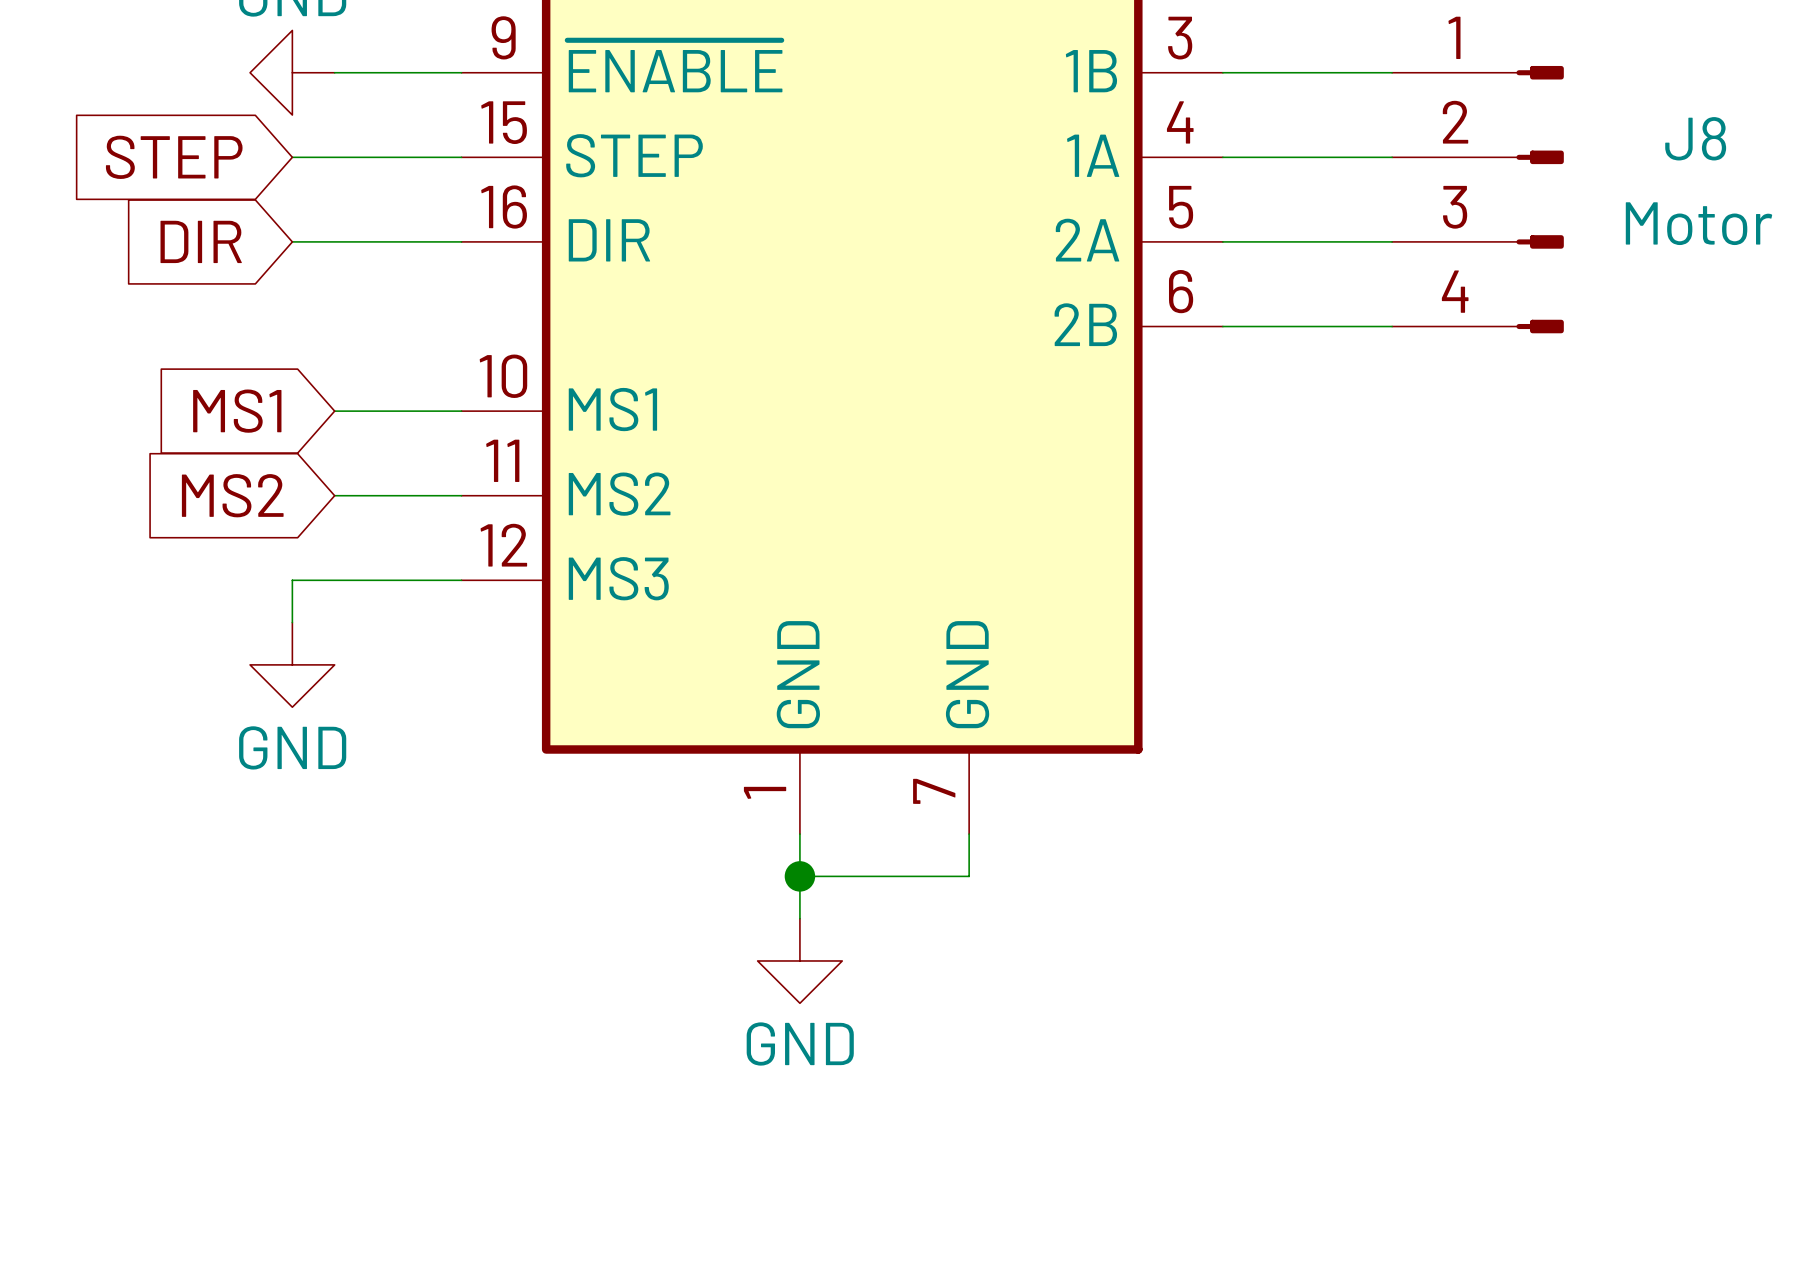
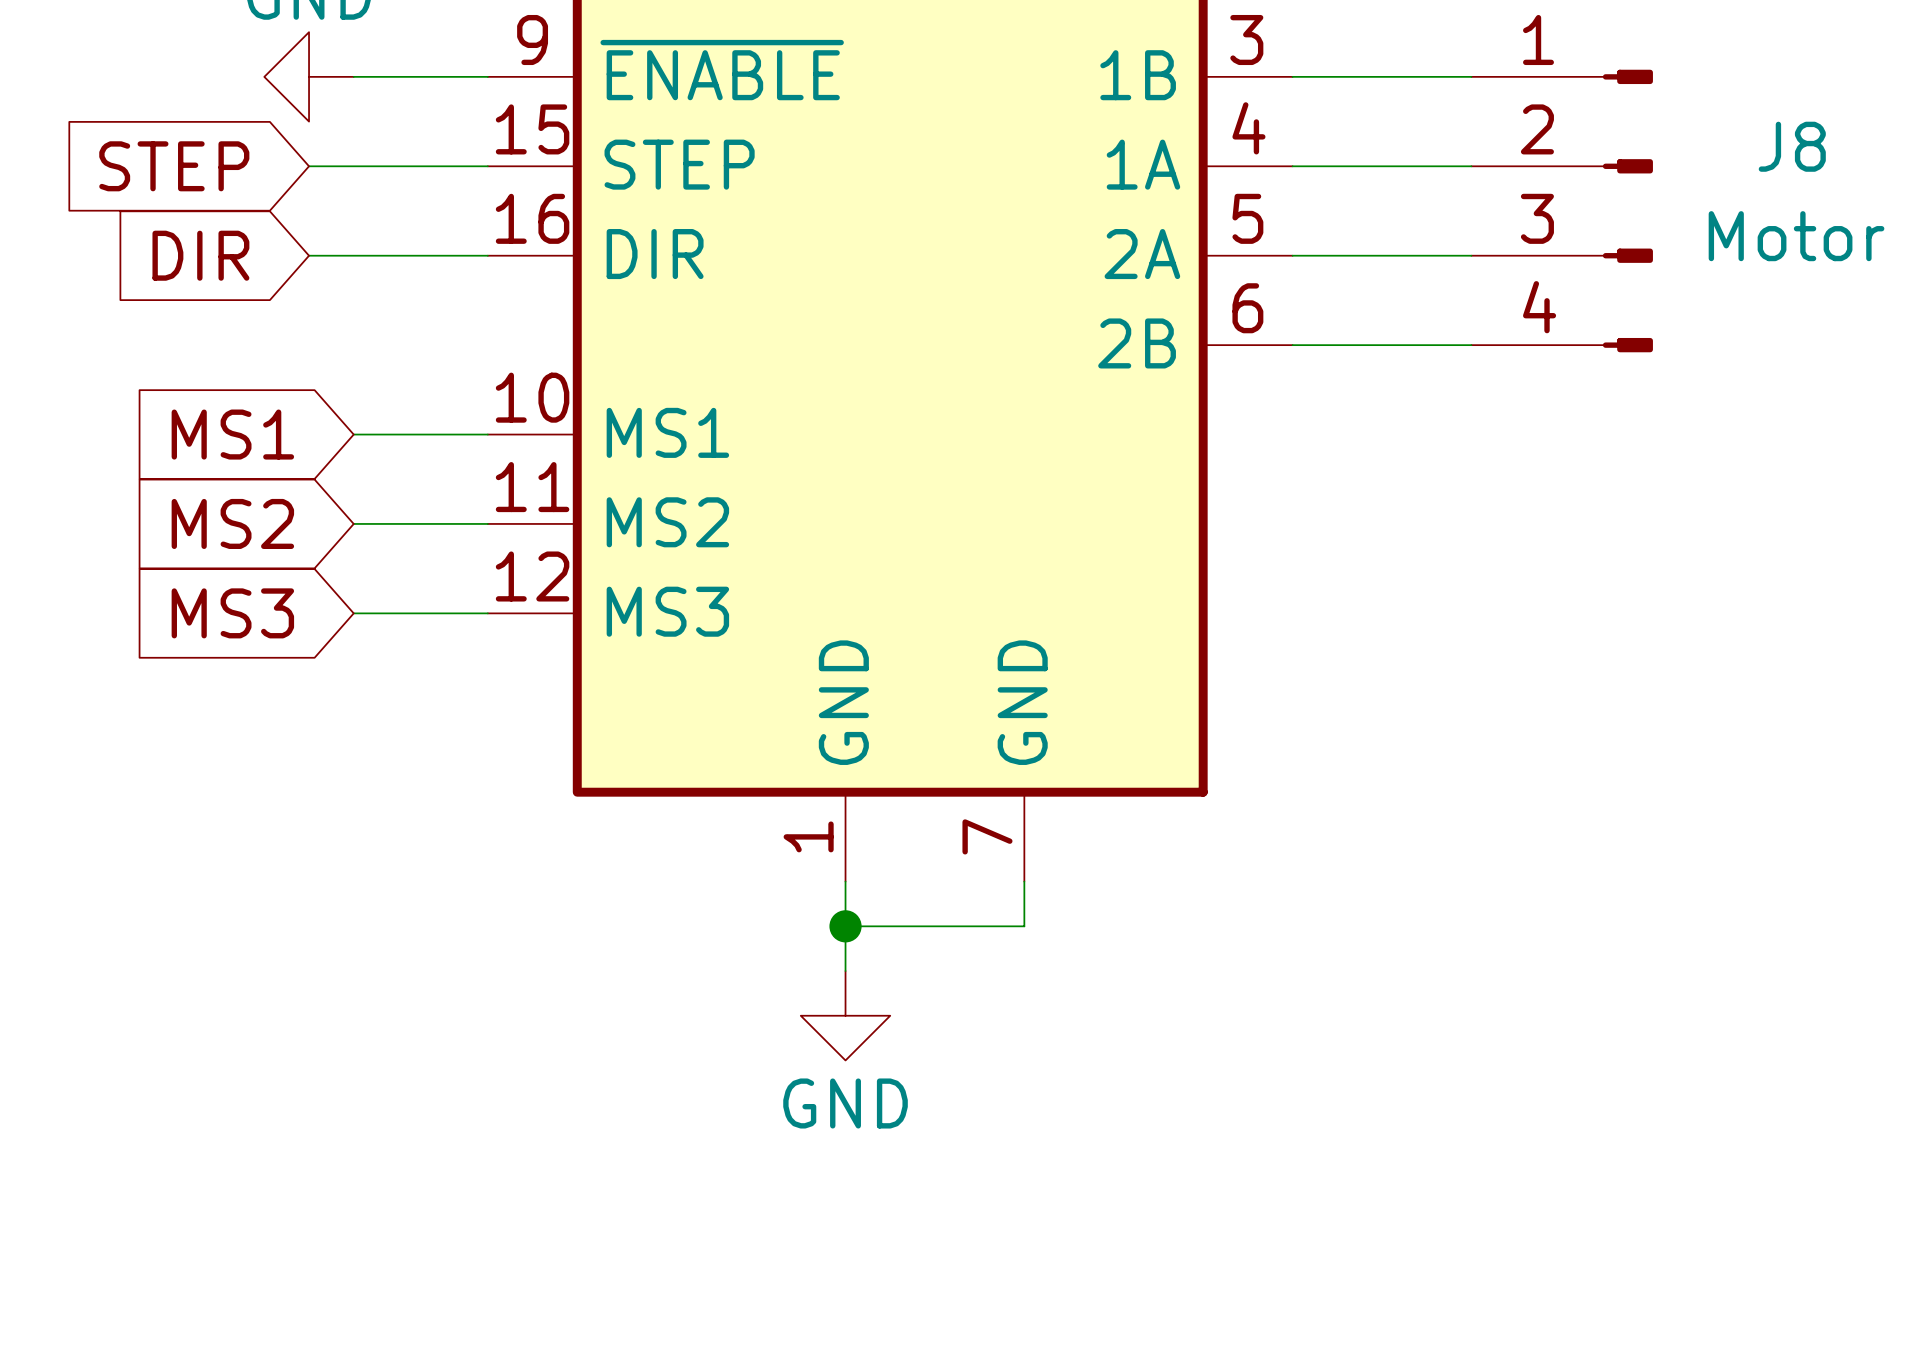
global label: none -> MS3 (232, 613)
wire: (334, 580) (292, 580) (292, 622) -> none
power symbol: GND (292, 664) -> none

